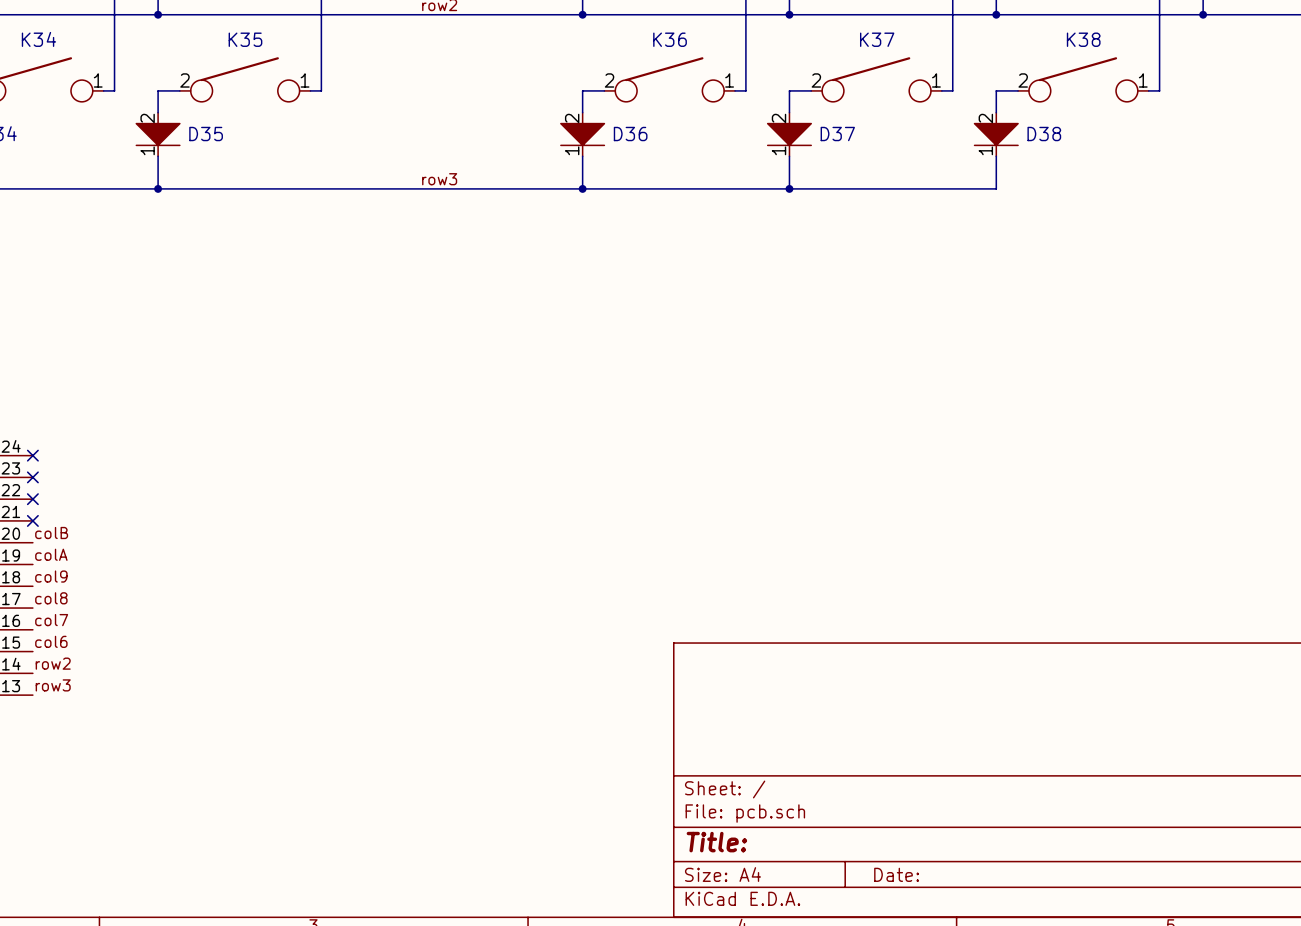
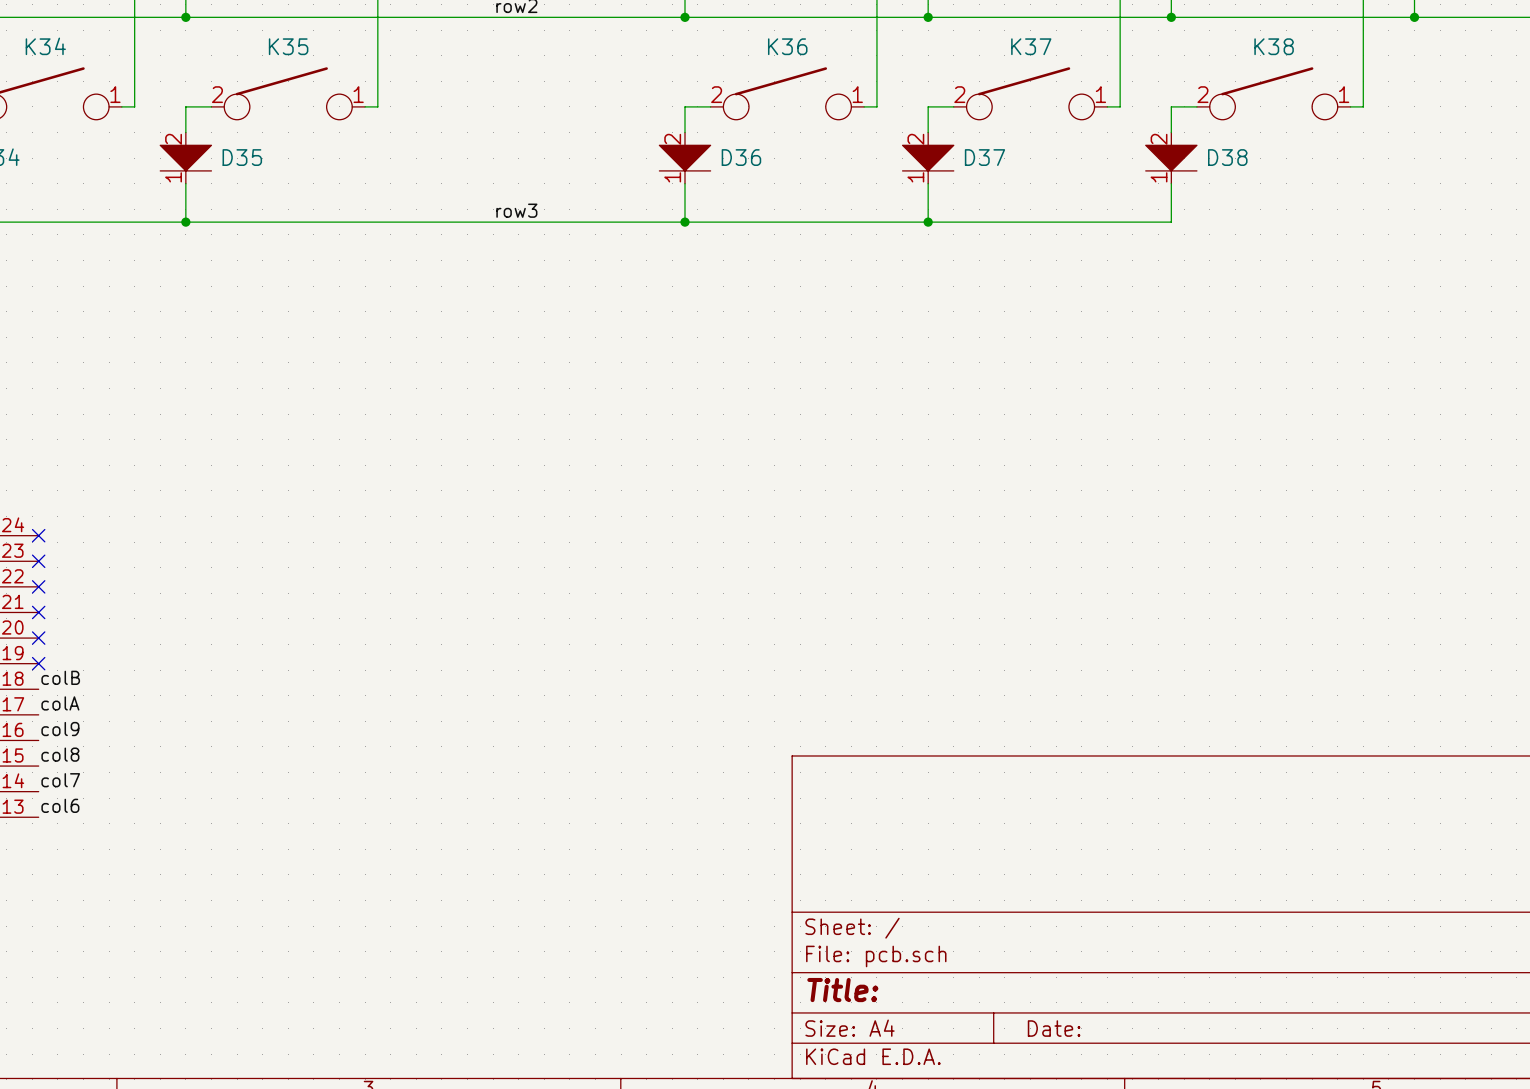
label: colB (51, 533) -> none
no-connect mark: none -> (38, 638)
label: colA (51, 554) -> none
no-connect mark: none -> (38, 663)
label: col9 (51, 576) -> colB (60, 677)
label: col8 (51, 598) -> colA (60, 703)
label: col7 (51, 620) -> col9 (60, 729)
label: col6 (51, 641) -> col8 (60, 754)
label: row2 (53, 663) -> col7 (60, 780)
label: row3 (53, 685) -> col6 (60, 805)

